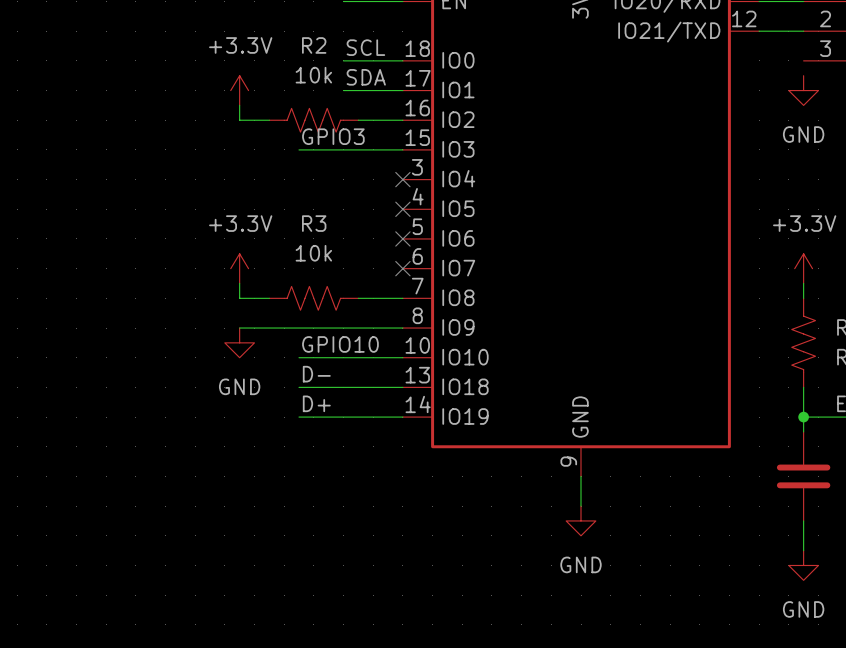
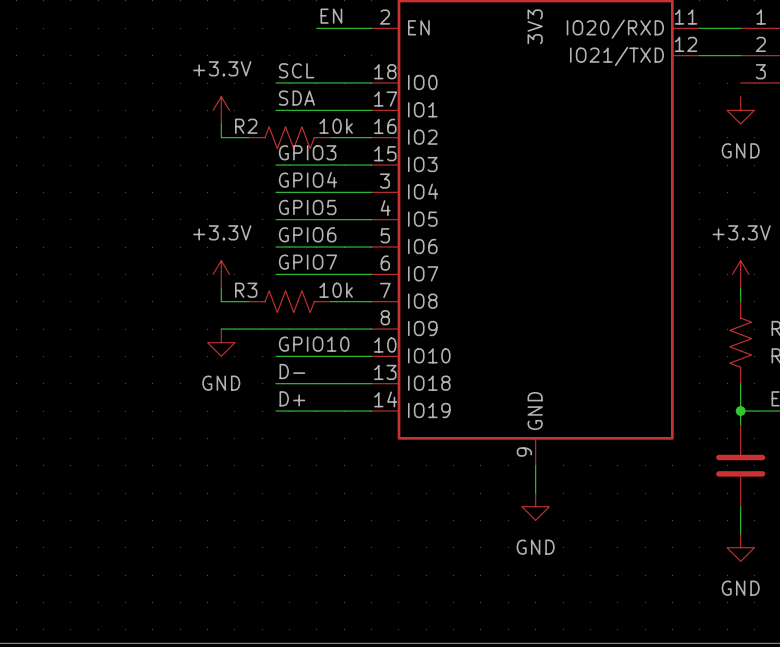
R2 name position: R2 (314, 45) -> R2 (246, 126)
label position: SCL (365, 47) -> SCL (296, 70)
wire: none -> (275, 83) (316, 83)
R2 value position: 10k (313, 75) -> 10k (336, 126)
label position: SDA (366, 77) -> SDA (296, 98)
wire: none -> (275, 110) (316, 110)
label: none -> GPIO4 (307, 179)
wire: none -> (275, 192) (371, 192)
no-connect mark: (402, 179) -> none
label: none -> GPIO5 (307, 207)
wire: none -> (275, 219) (371, 219)
no-connect mark: (402, 209) -> none
R3 name position: R3 (314, 223) -> R3 (246, 290)
label: none -> GPIO6 (307, 234)
wire: none -> (275, 247) (371, 247)
no-connect mark: (402, 238) -> none
R3 value position: 10k (313, 253) -> 10k (336, 290)
label: none -> GPIO7 (307, 262)
wire: none -> (275, 274) (371, 274)
no-connect mark: (402, 268) -> none

